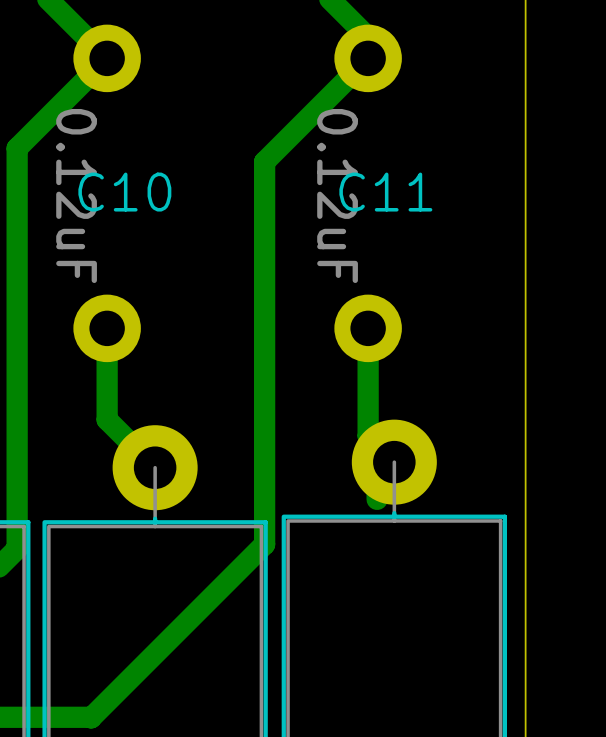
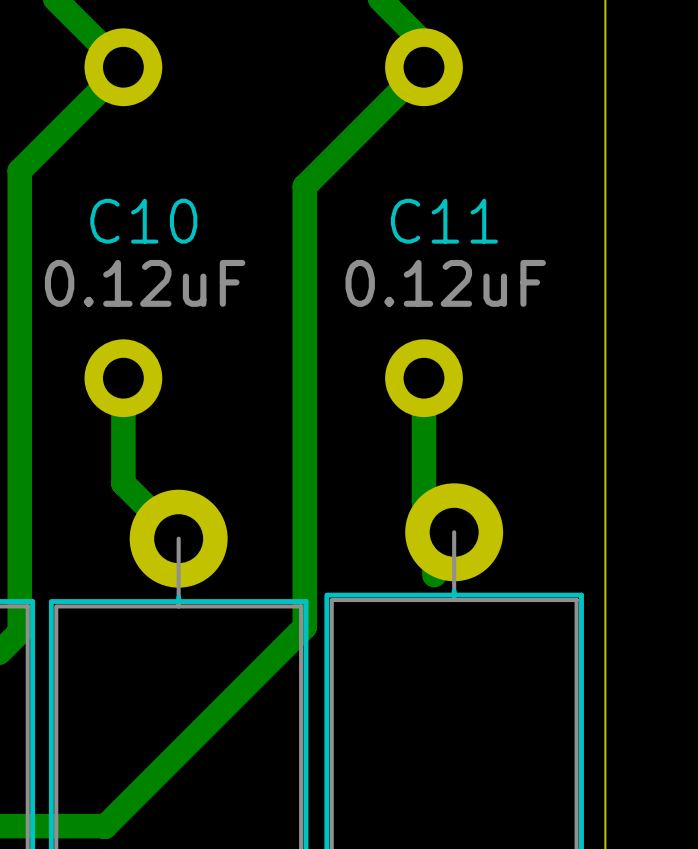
C10 value rotation: 0° (76, 195) -> 90° counterclockwise (145, 283)
C11 value rotation: 0° (337, 195) -> 90° counterclockwise (445, 283)

